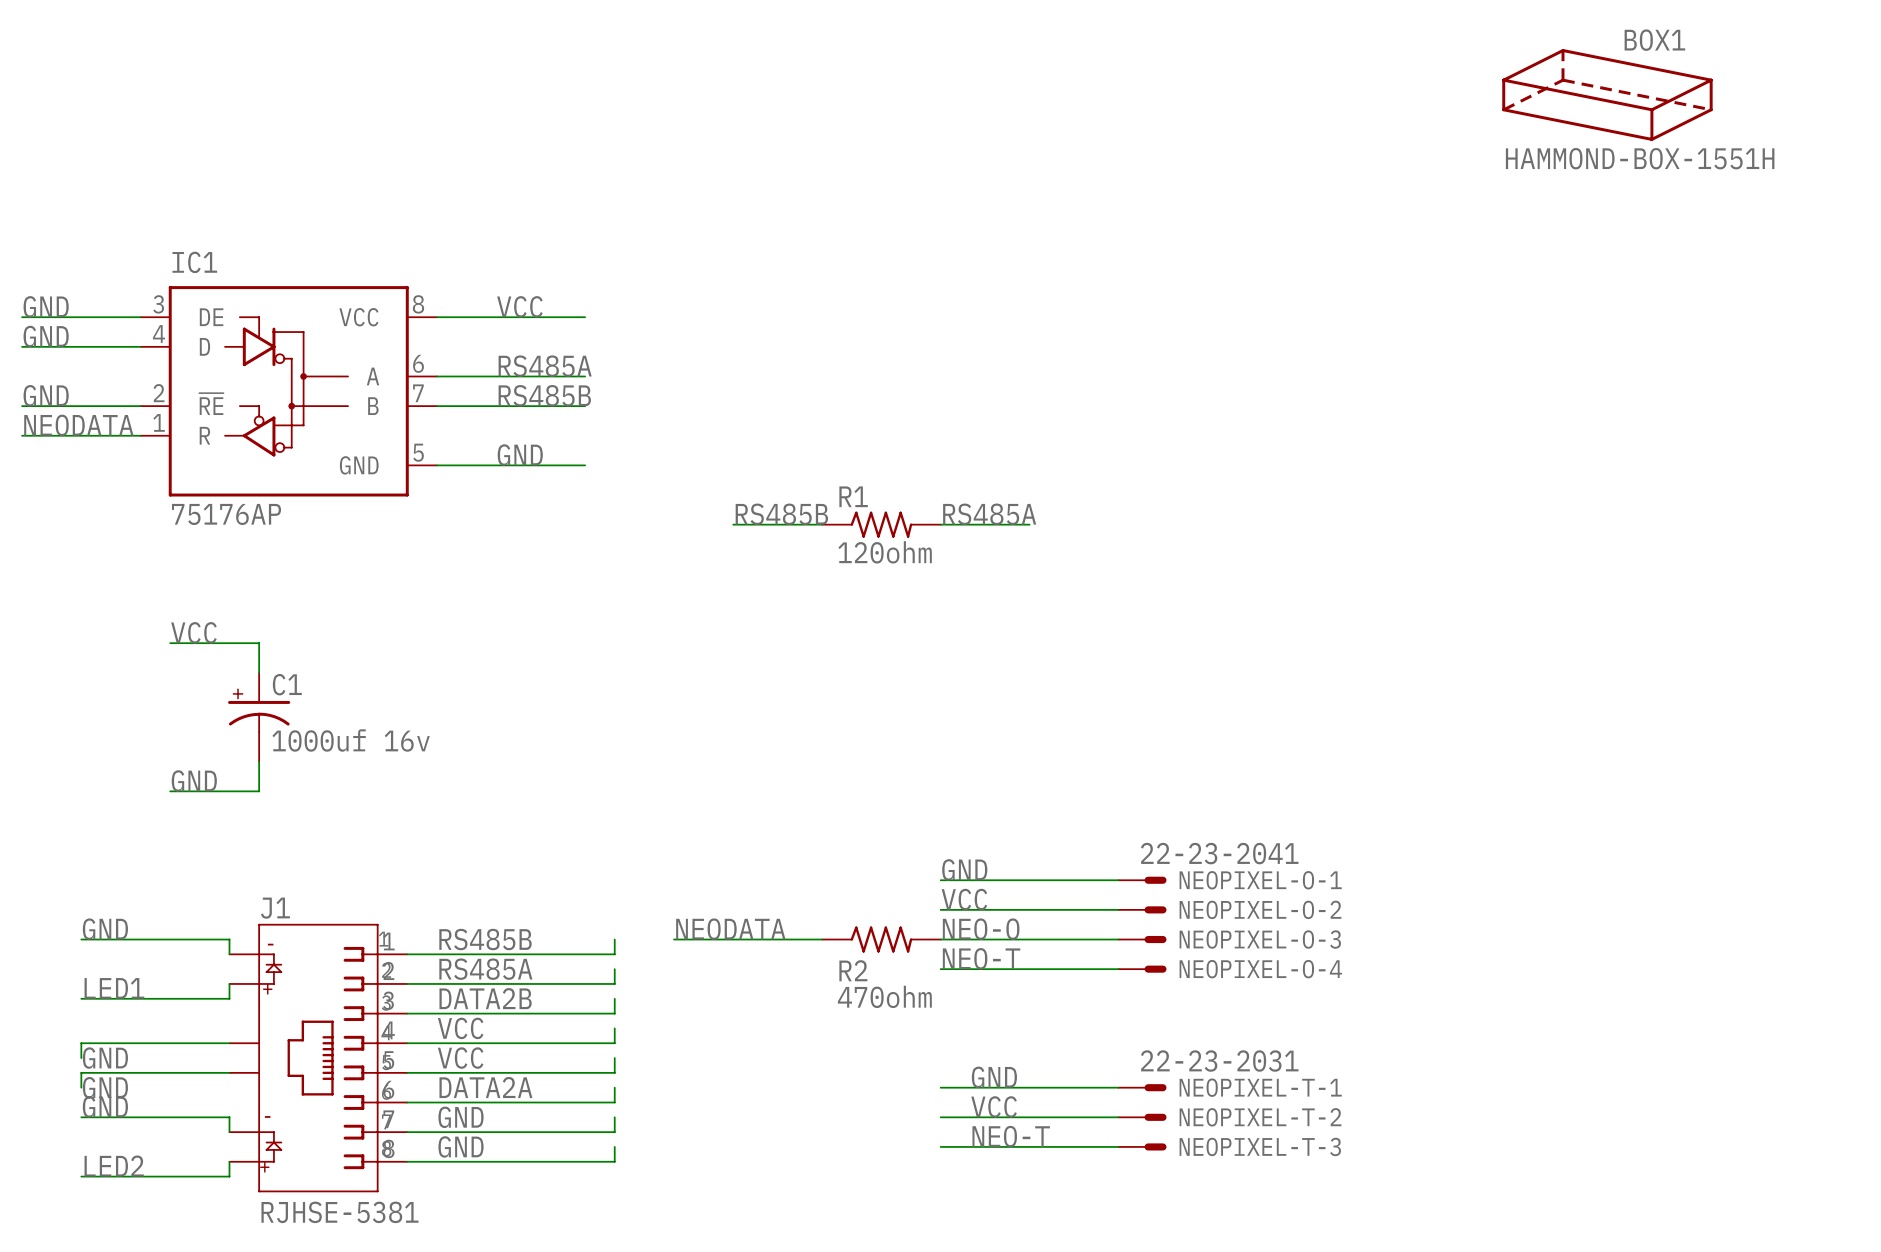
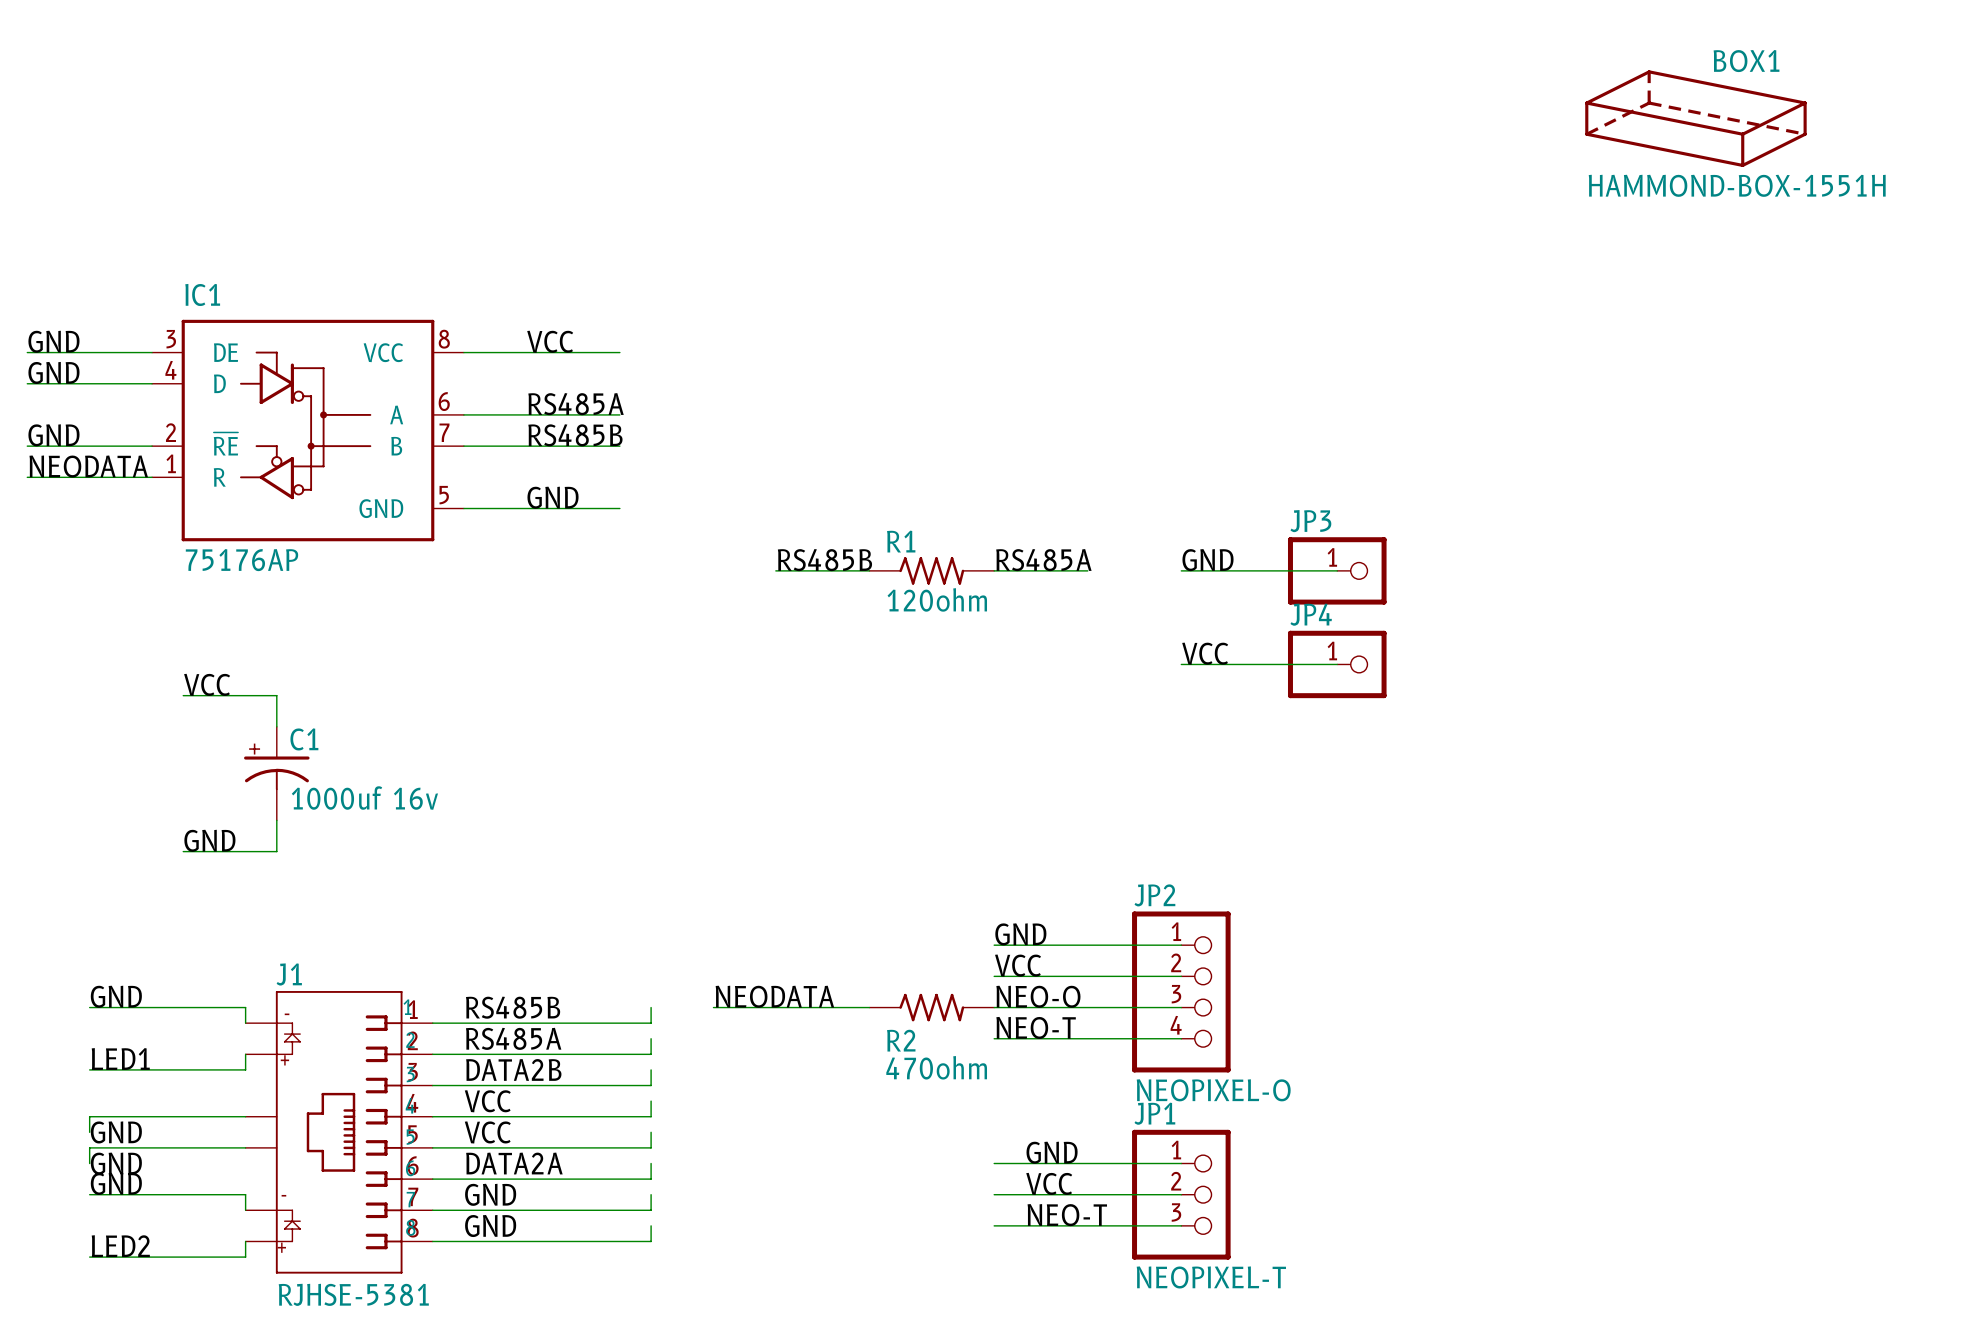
label: none -> GND (1208, 560)
wire: none -> (1181, 570) (1337, 570)
JP3: none -> (1337, 570)
label: none -> VCC (1205, 653)
wire: none -> (1181, 664) (1337, 664)
JP4: none -> (1337, 664)
NEOPIXEL-O-1: 22-23-2041 (1142, 880) -> none
NEOPIXEL-O-2: (1142, 909) -> none
JP2: none -> NEOPIXEL-O (1181, 991)
NEOPIXEL-O-3: (1142, 939) -> none
NEOPIXEL-O-4: (1142, 969) -> none
NEOPIXEL-T-1: 22-23-2031 (1142, 1087) -> none
JP1: none -> NEOPIXEL-T (1181, 1194)
NEOPIXEL-T-2: (1142, 1117) -> none
NEOPIXEL-T-3: (1142, 1146) -> none

